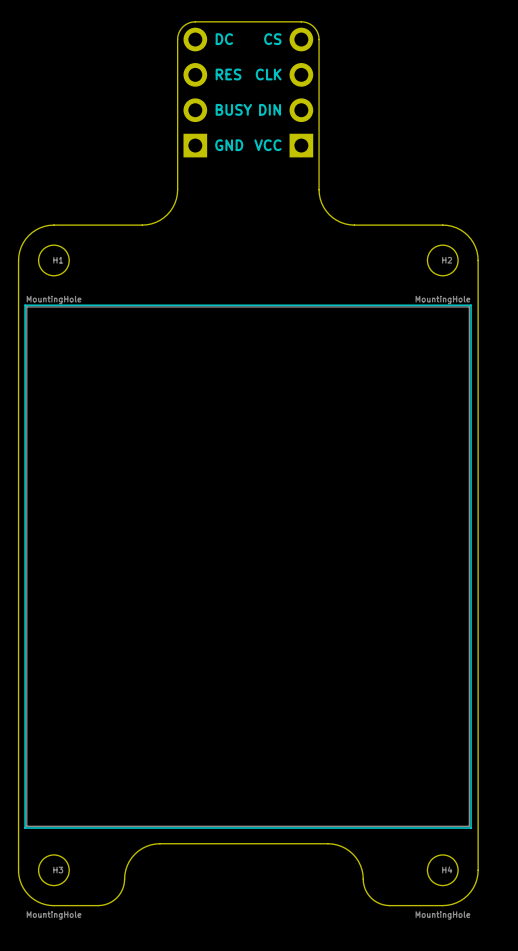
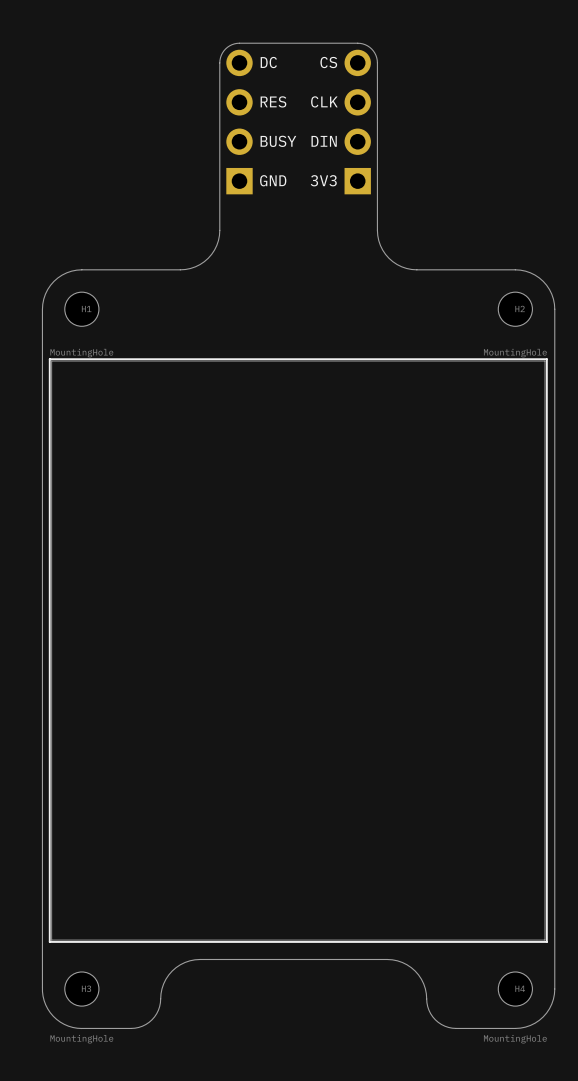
text: VCC (267, 145) -> 3V3 (323, 180)

